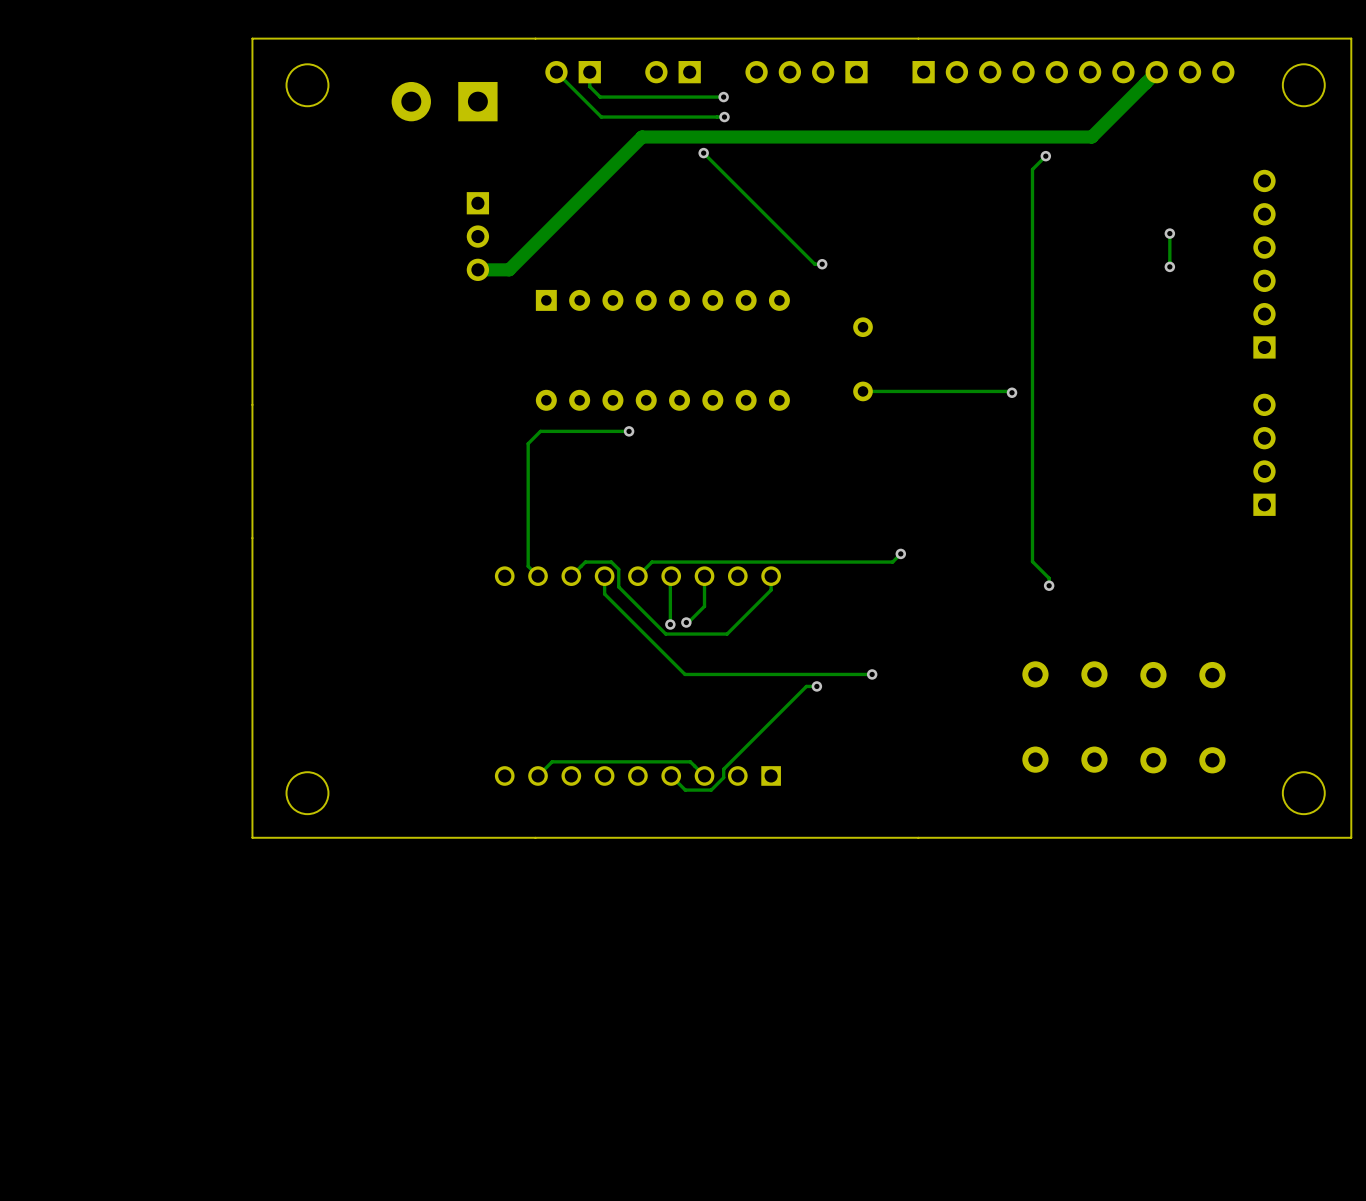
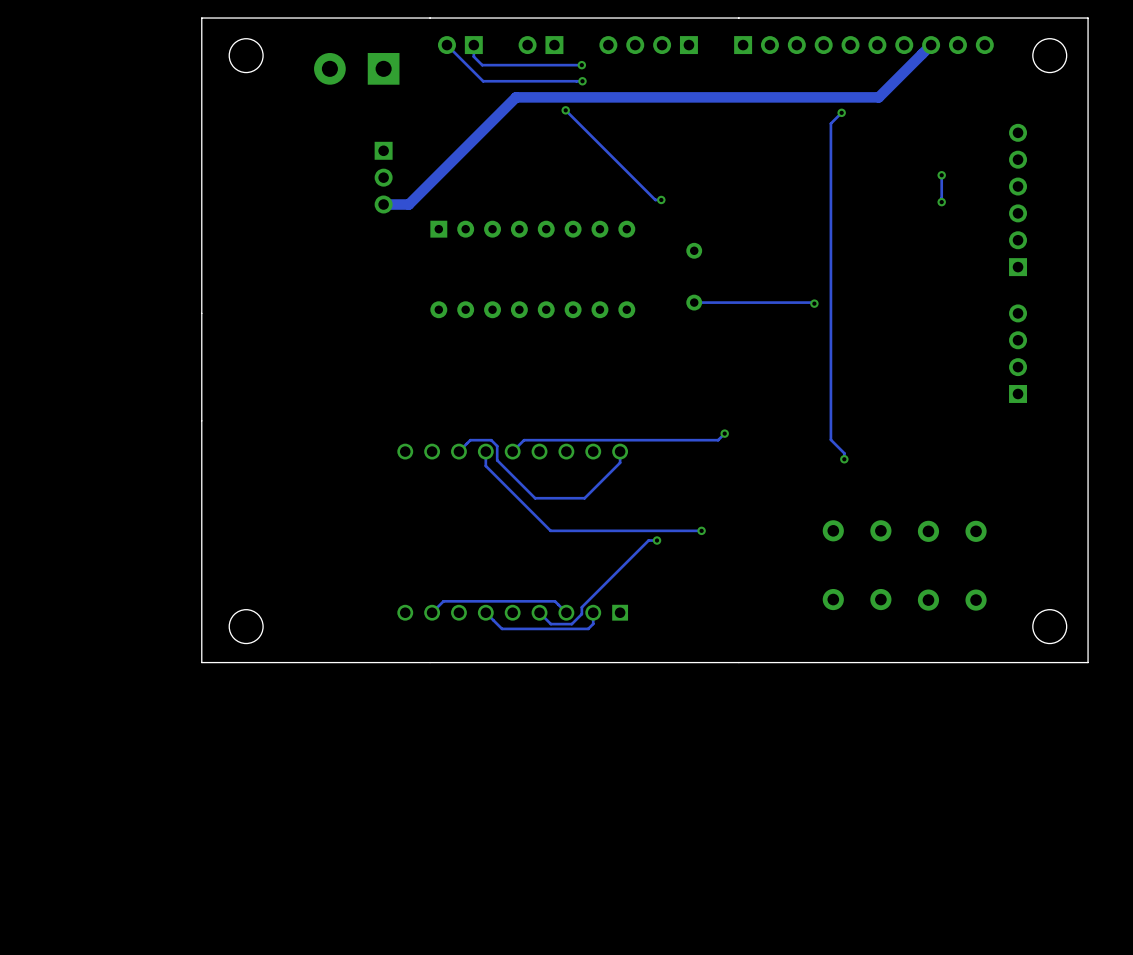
track: (629, 431) (540, 431) (528, 443) (528, 566) (538, 576) -> none
via: (629, 431) -> none
track: (704, 576) (704, 606) (686, 622) -> none
track: (670, 577) (670, 624) -> none
via: (686, 622) -> none
via: (670, 624) -> none
track: none -> (593, 612) (593, 623) (588, 628) (502, 628) (485, 612)

